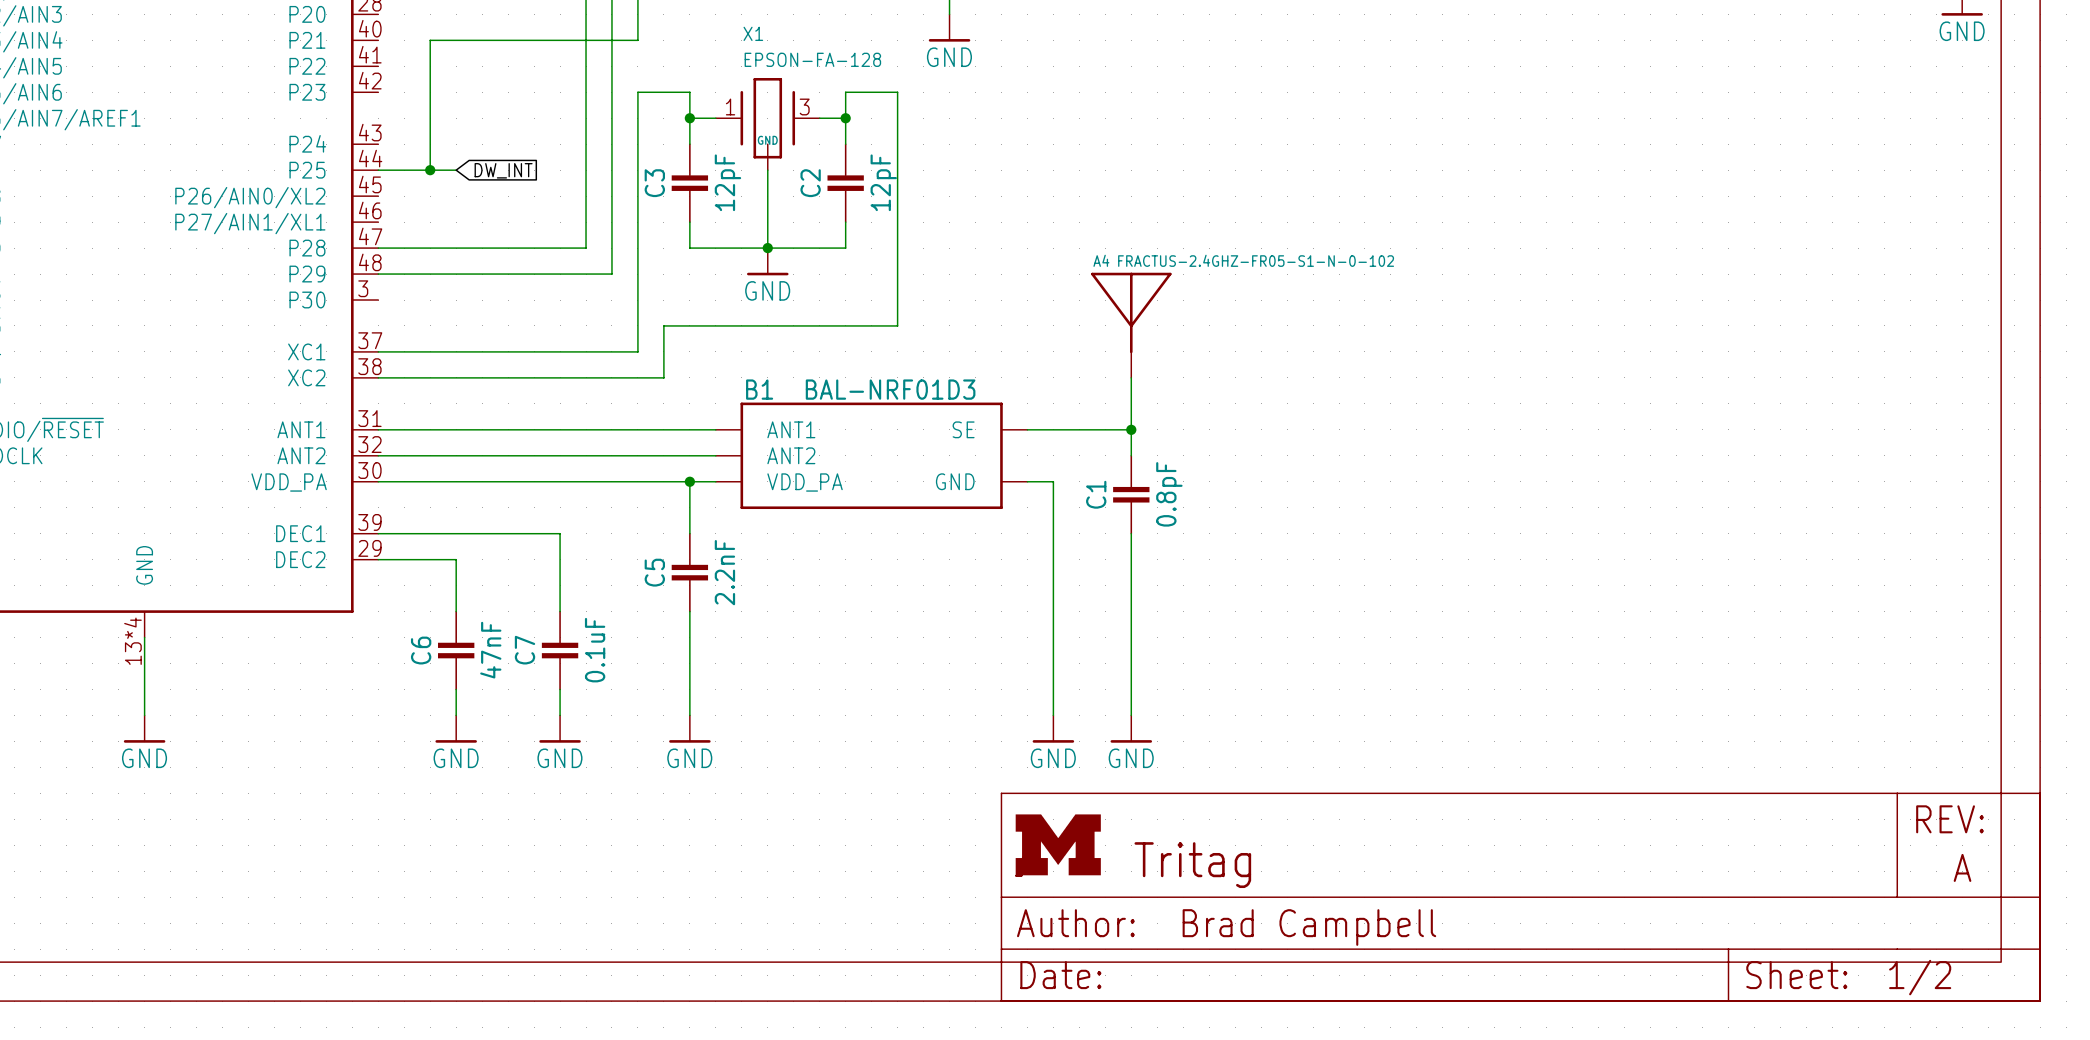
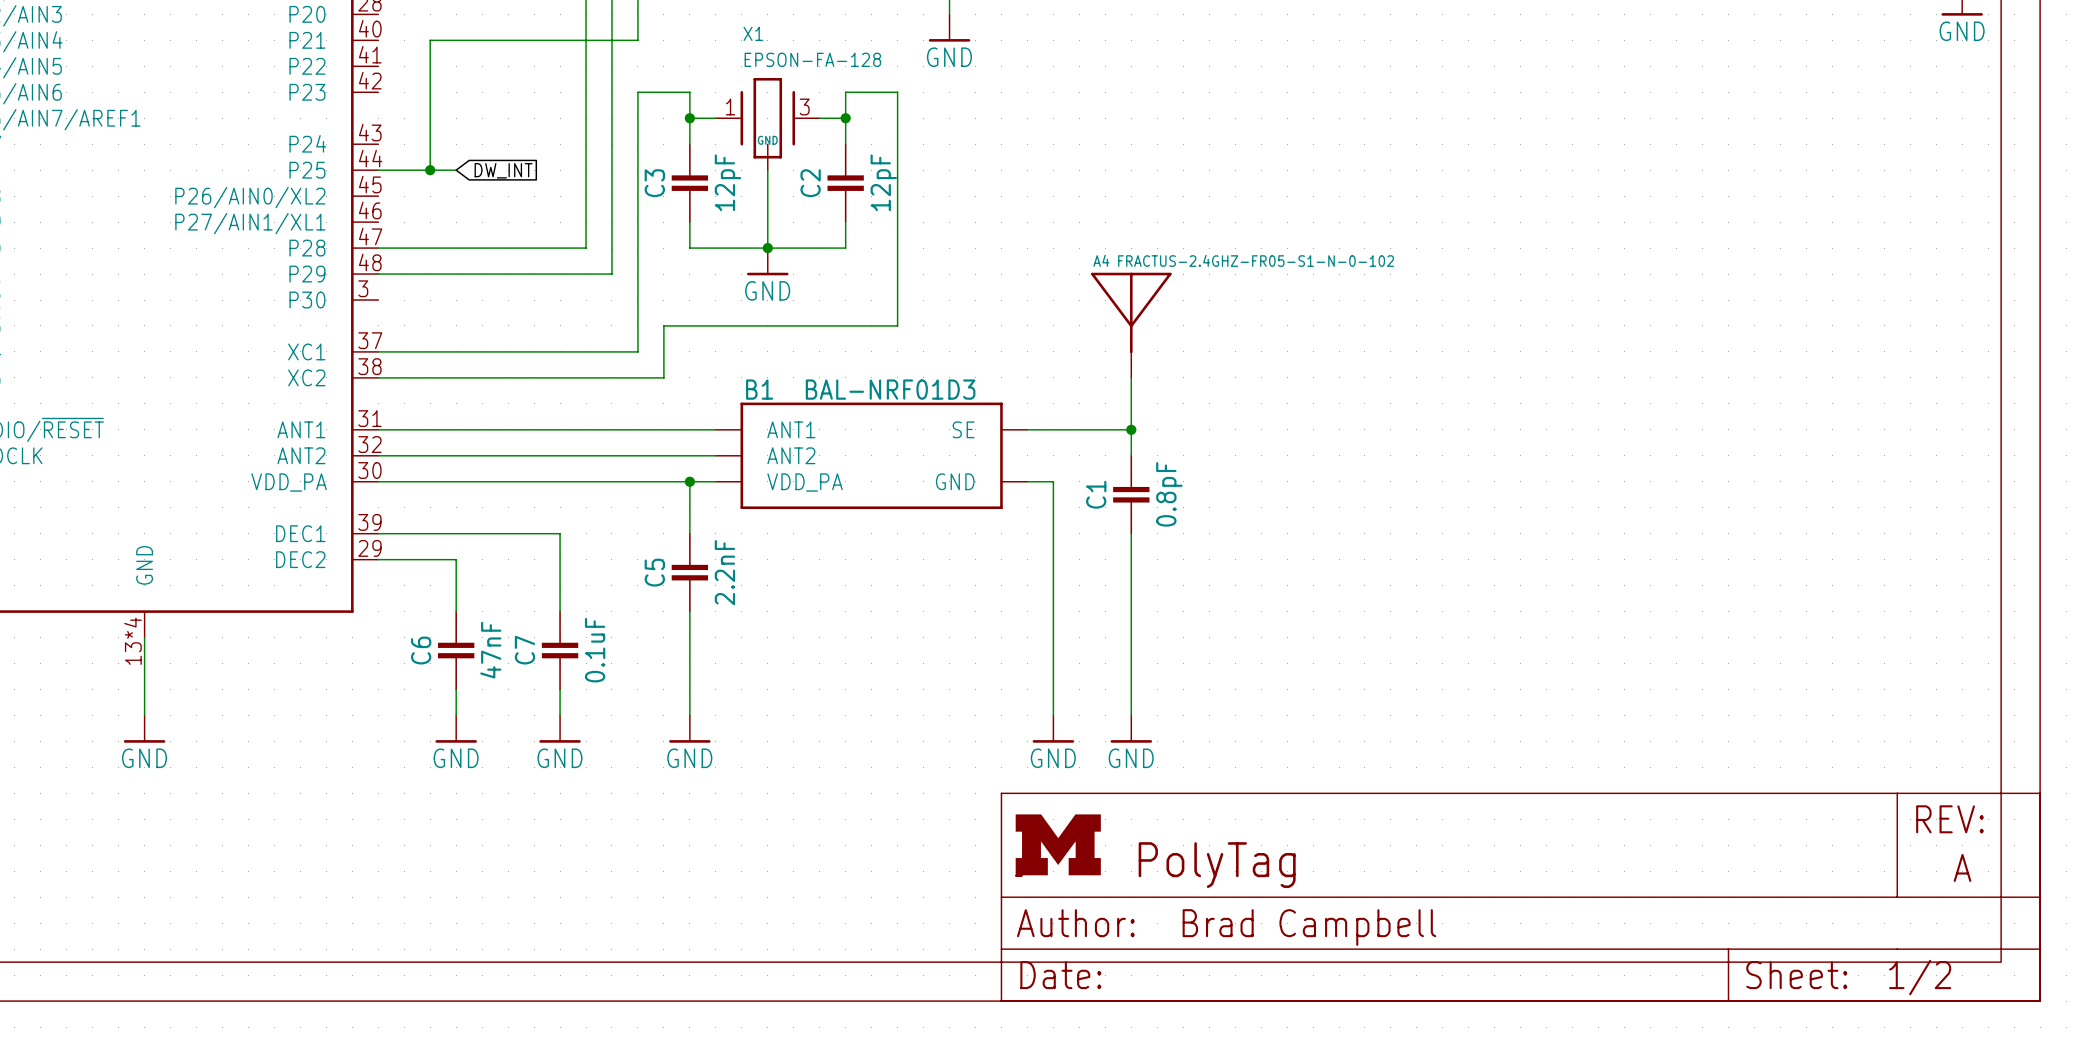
part text: Tritag (1192, 865) -> PolyTag (1217, 865)

